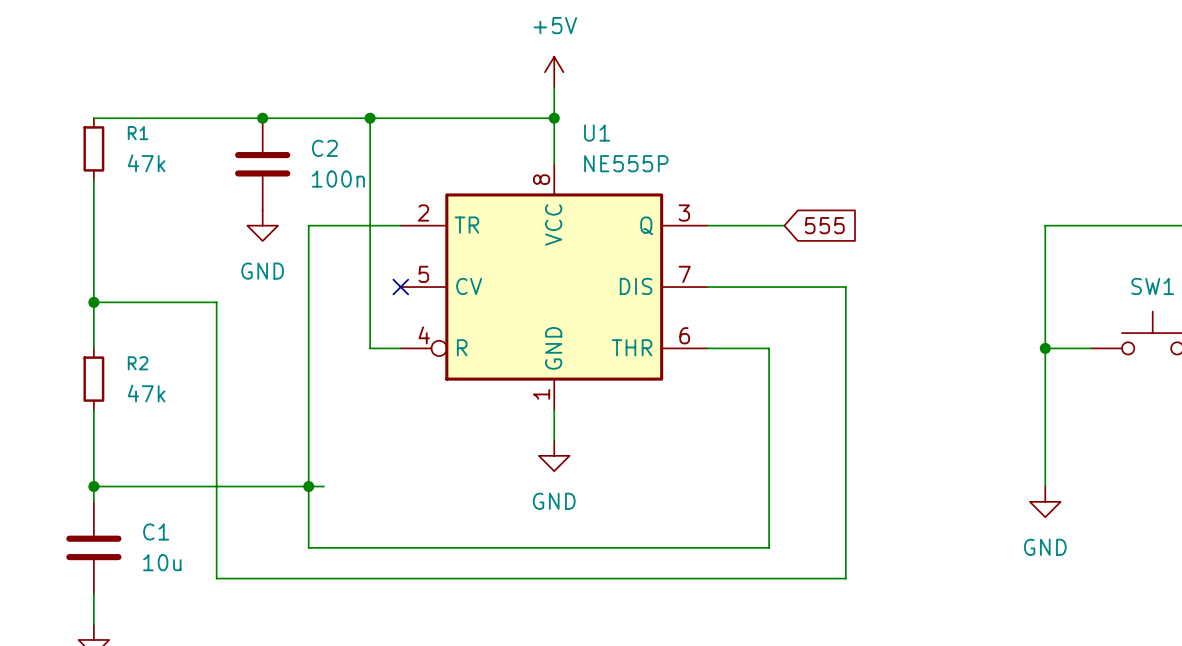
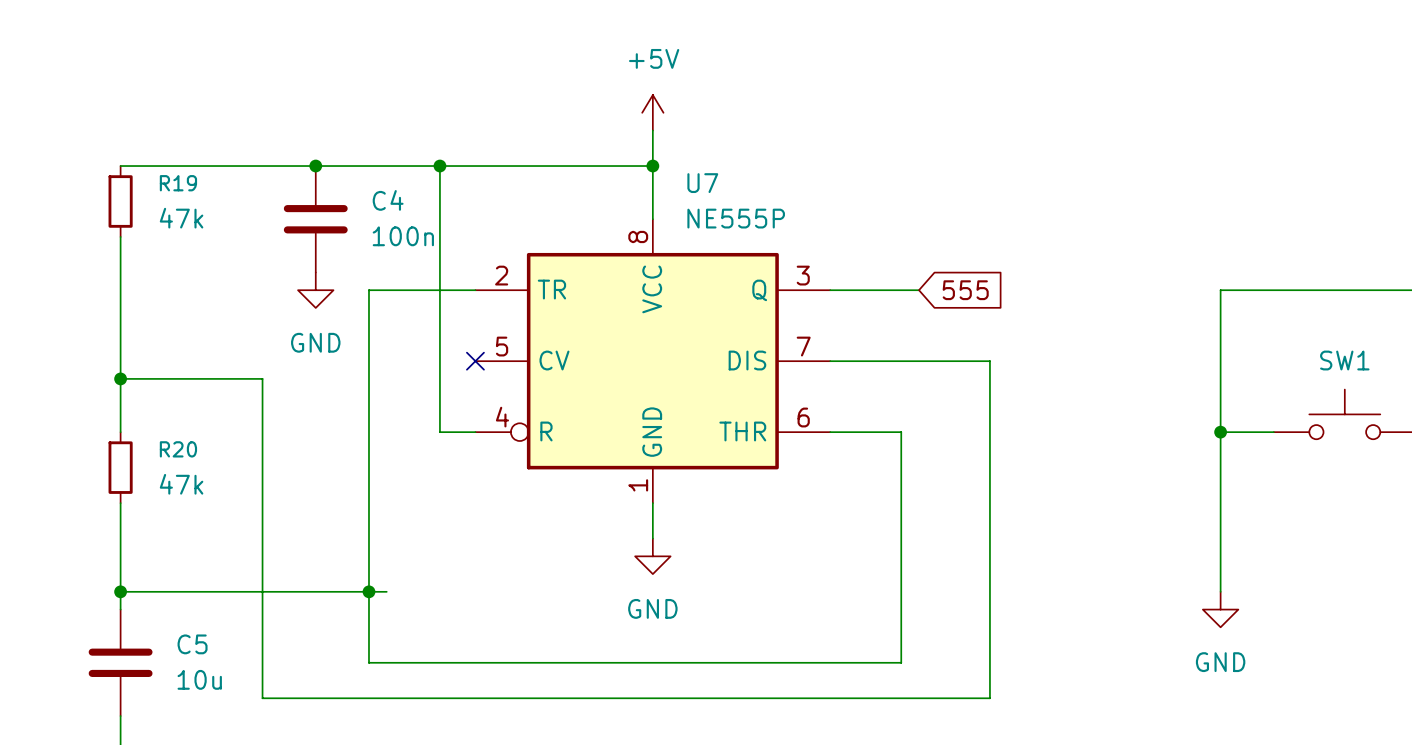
R1 name: R1 (138, 133) -> R19 (178, 183)
U1 name: U1 (597, 133) -> U7 (702, 183)
C2 name: C2 (324, 148) -> C4 (388, 200)
R2 name: R2 (138, 363) -> R20 (178, 449)
C1 name: C1 (156, 531) -> C5 (192, 644)

